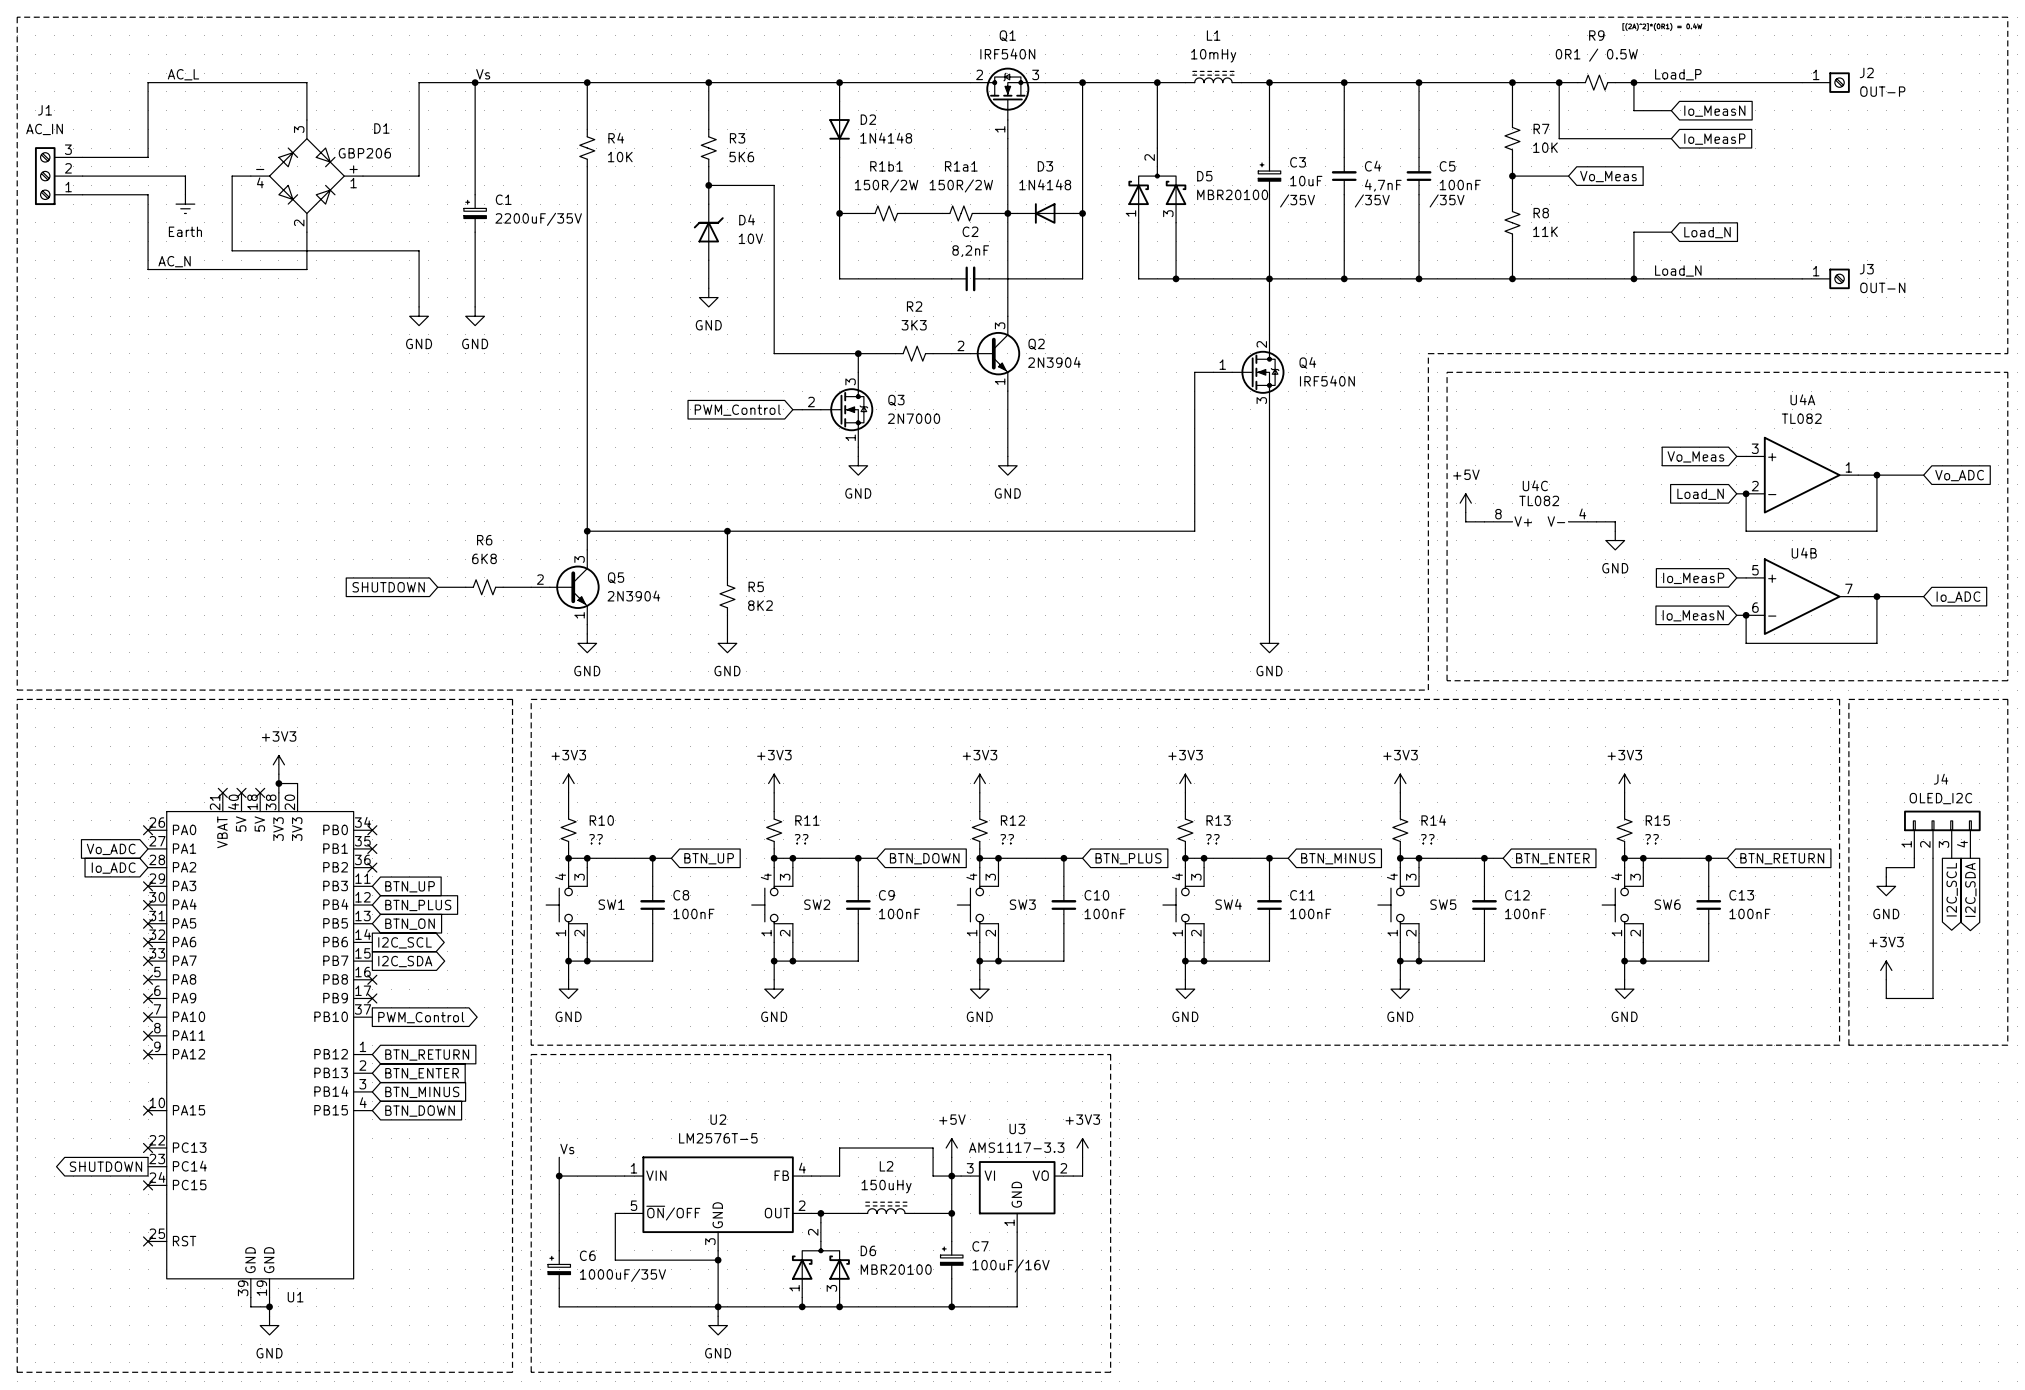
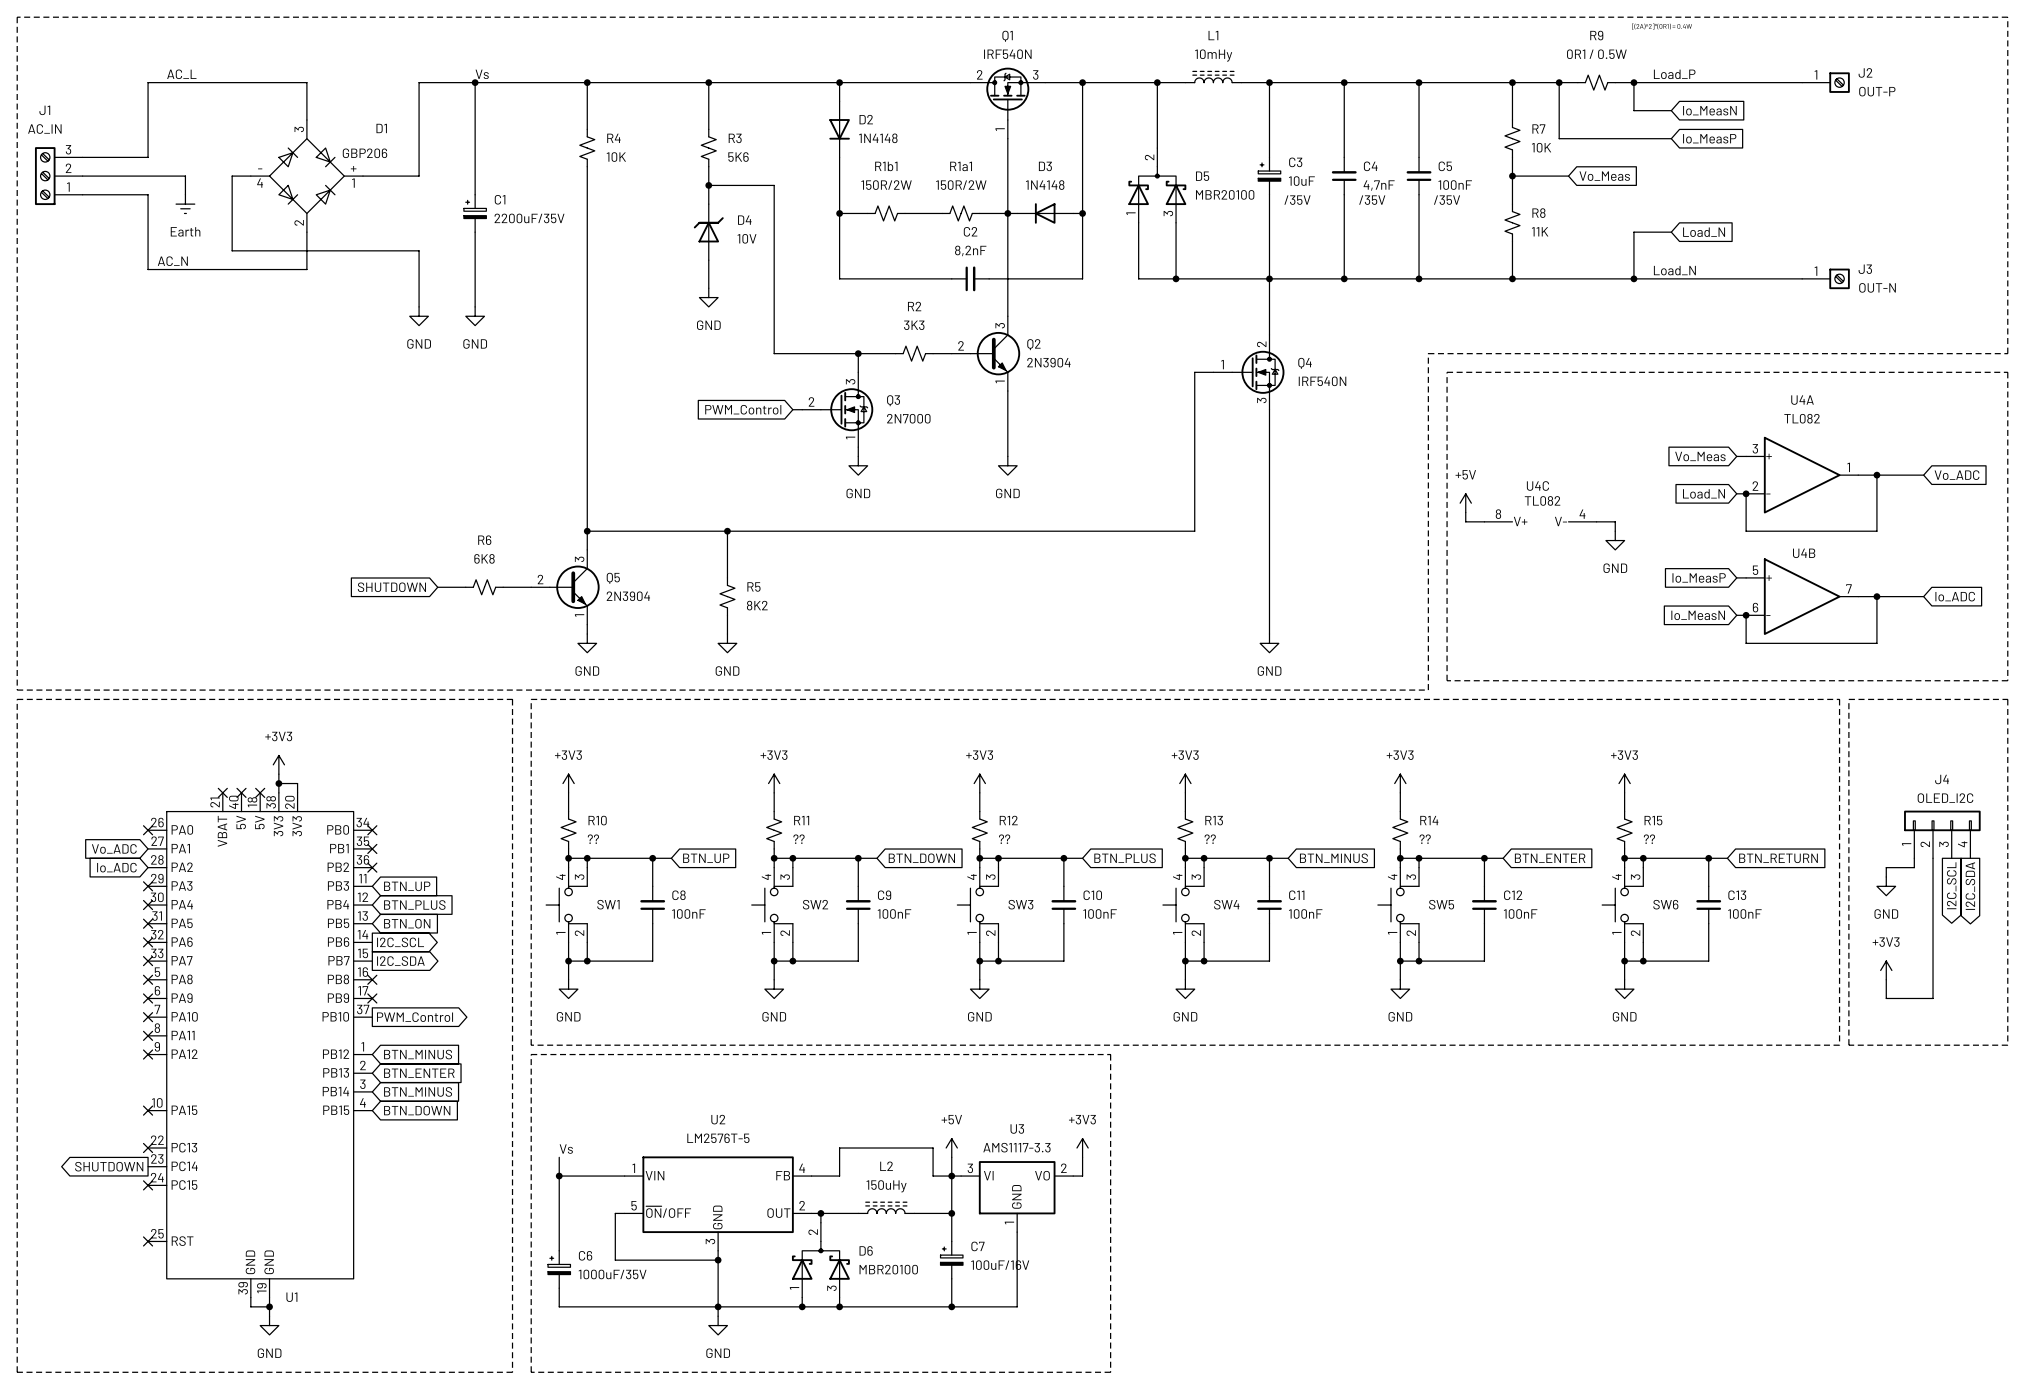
global label: BTN_RETURN (427, 1054) -> BTN_MINUS (418, 1054)

